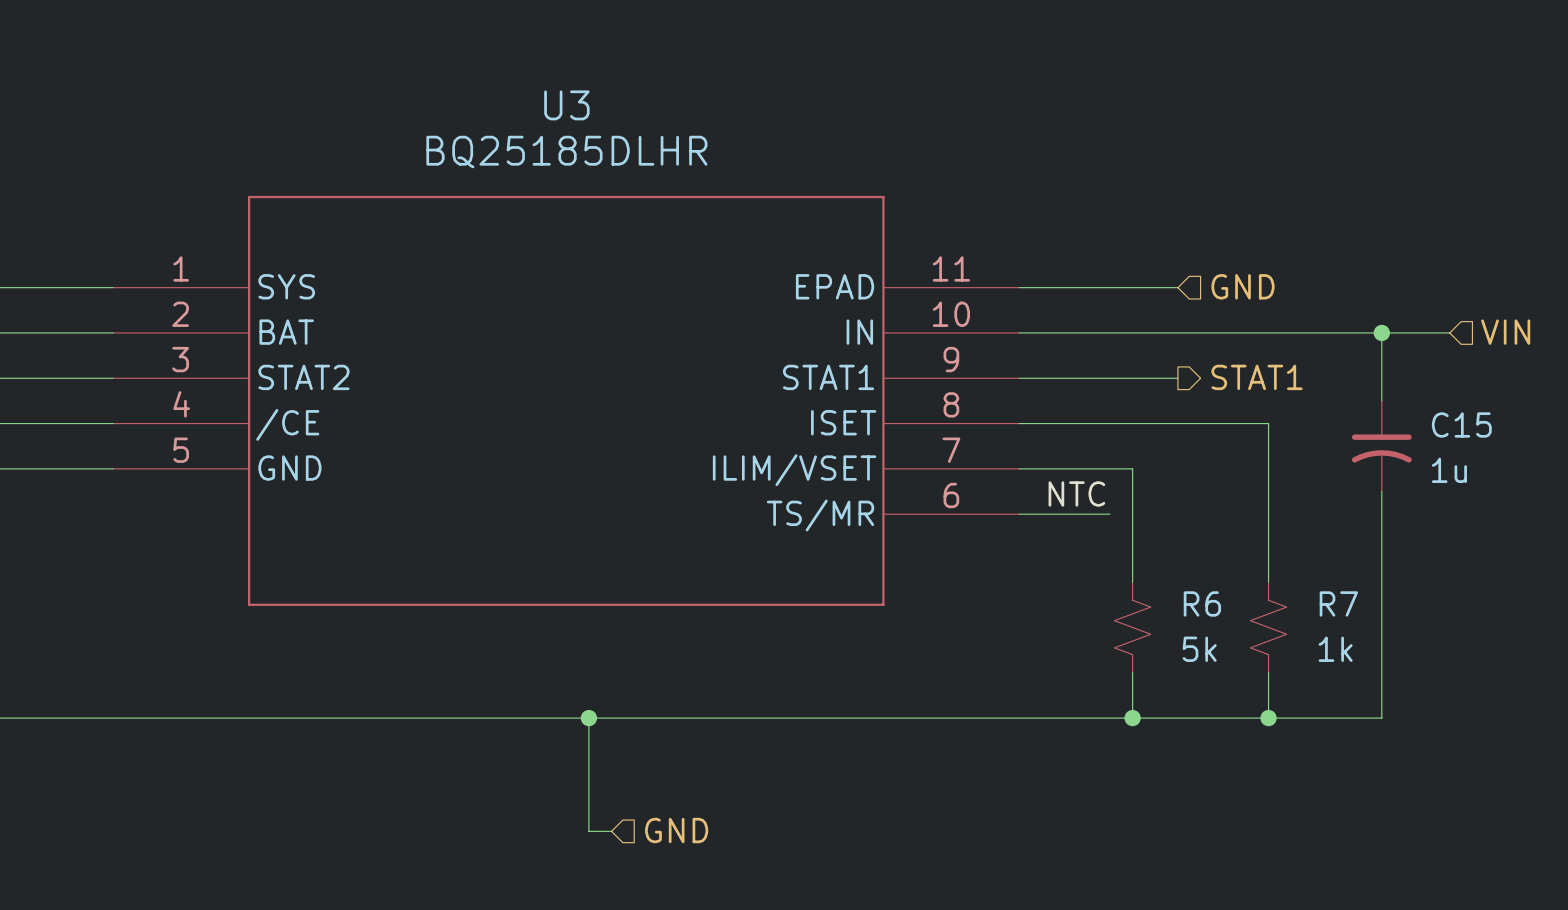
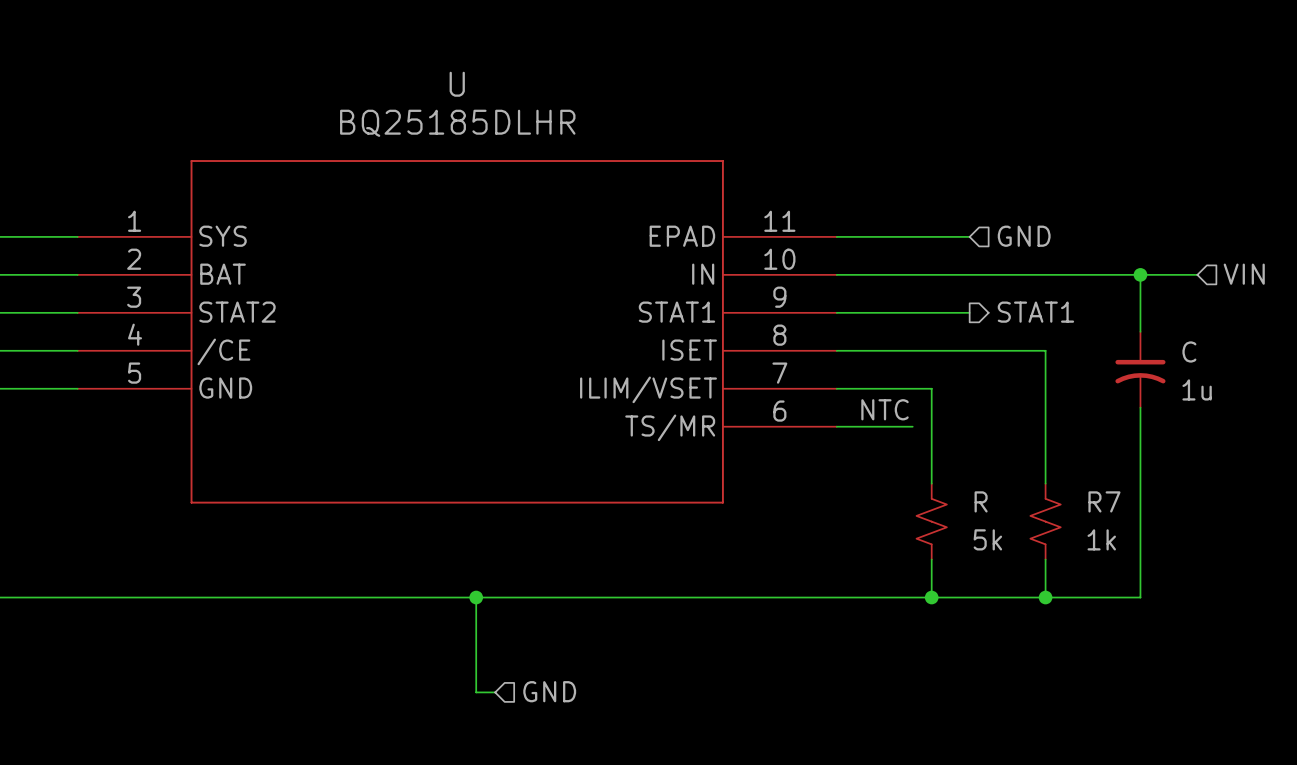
U3 name: U3 (566, 105) -> U (457, 84)
C15 name: C15 (1461, 424) -> C (1189, 351)
R6 name: R6 (1202, 603) -> R (981, 501)

